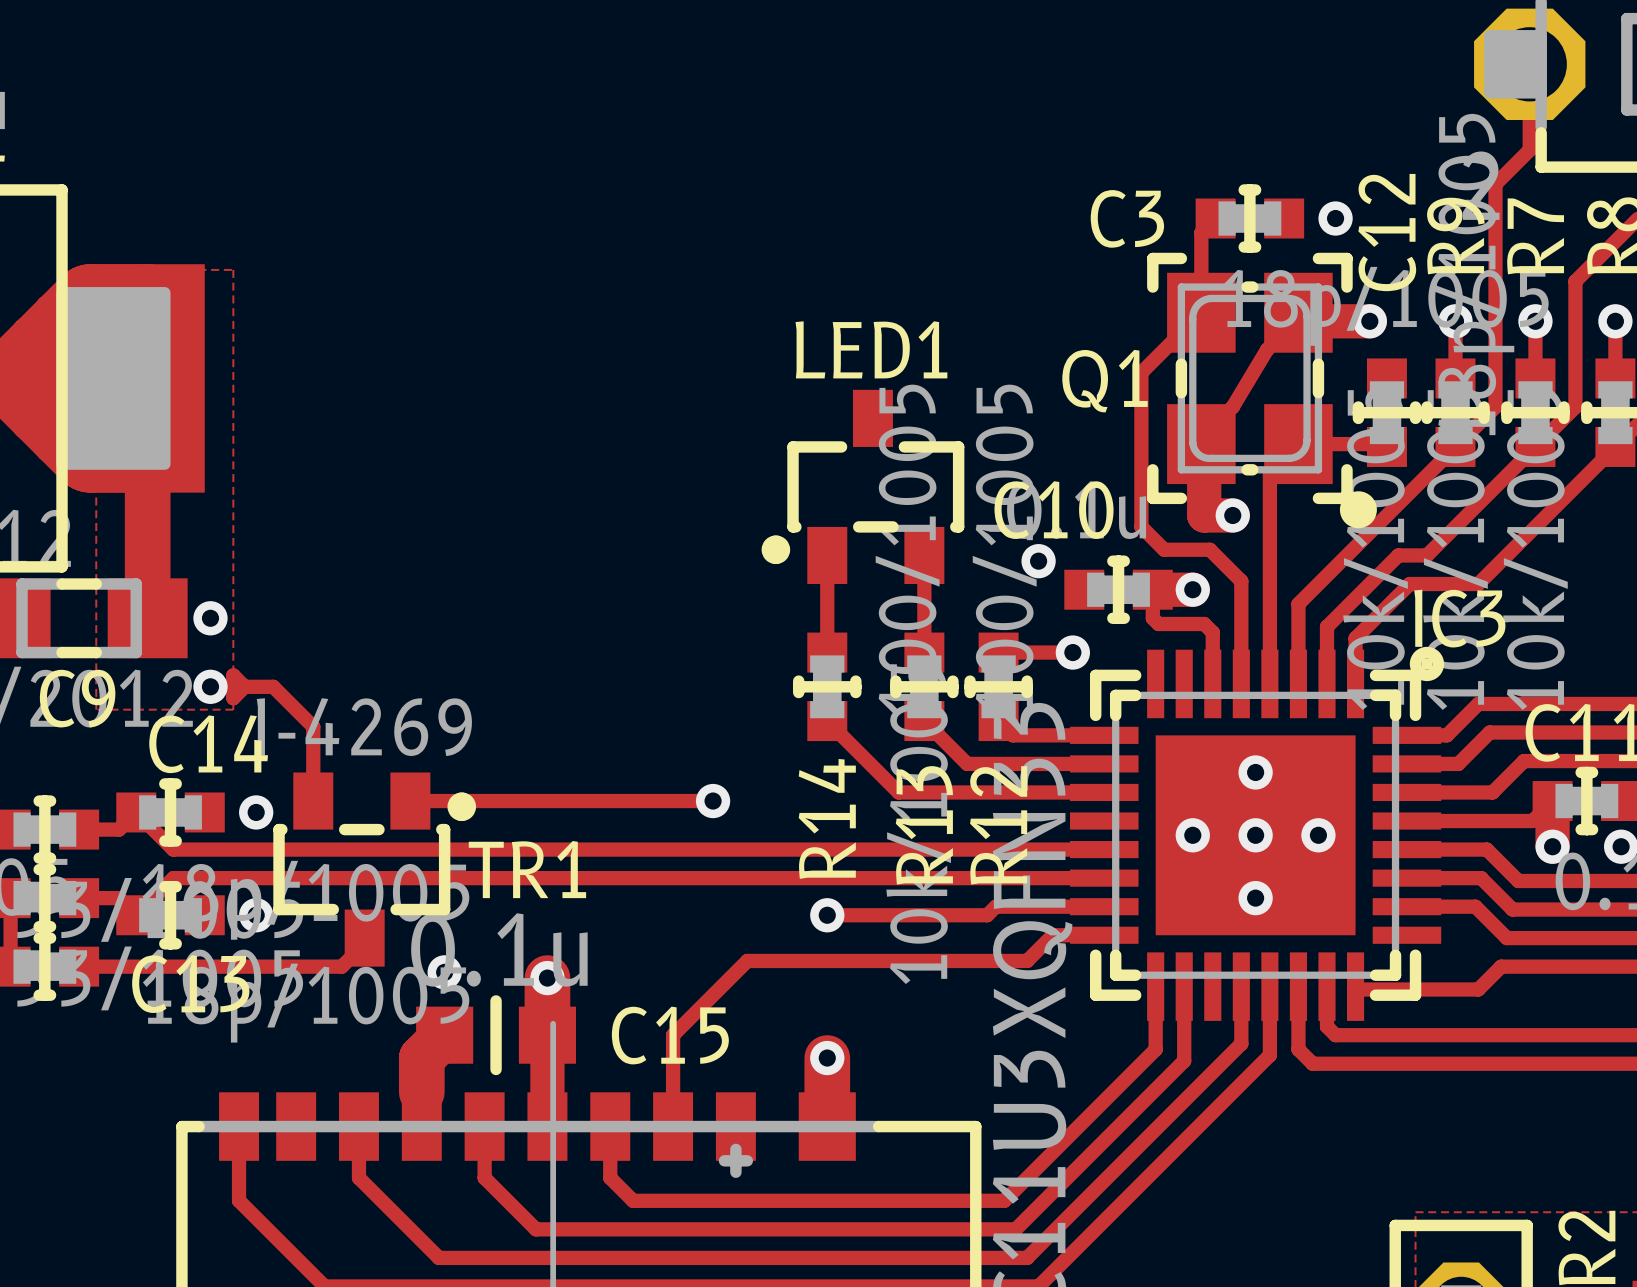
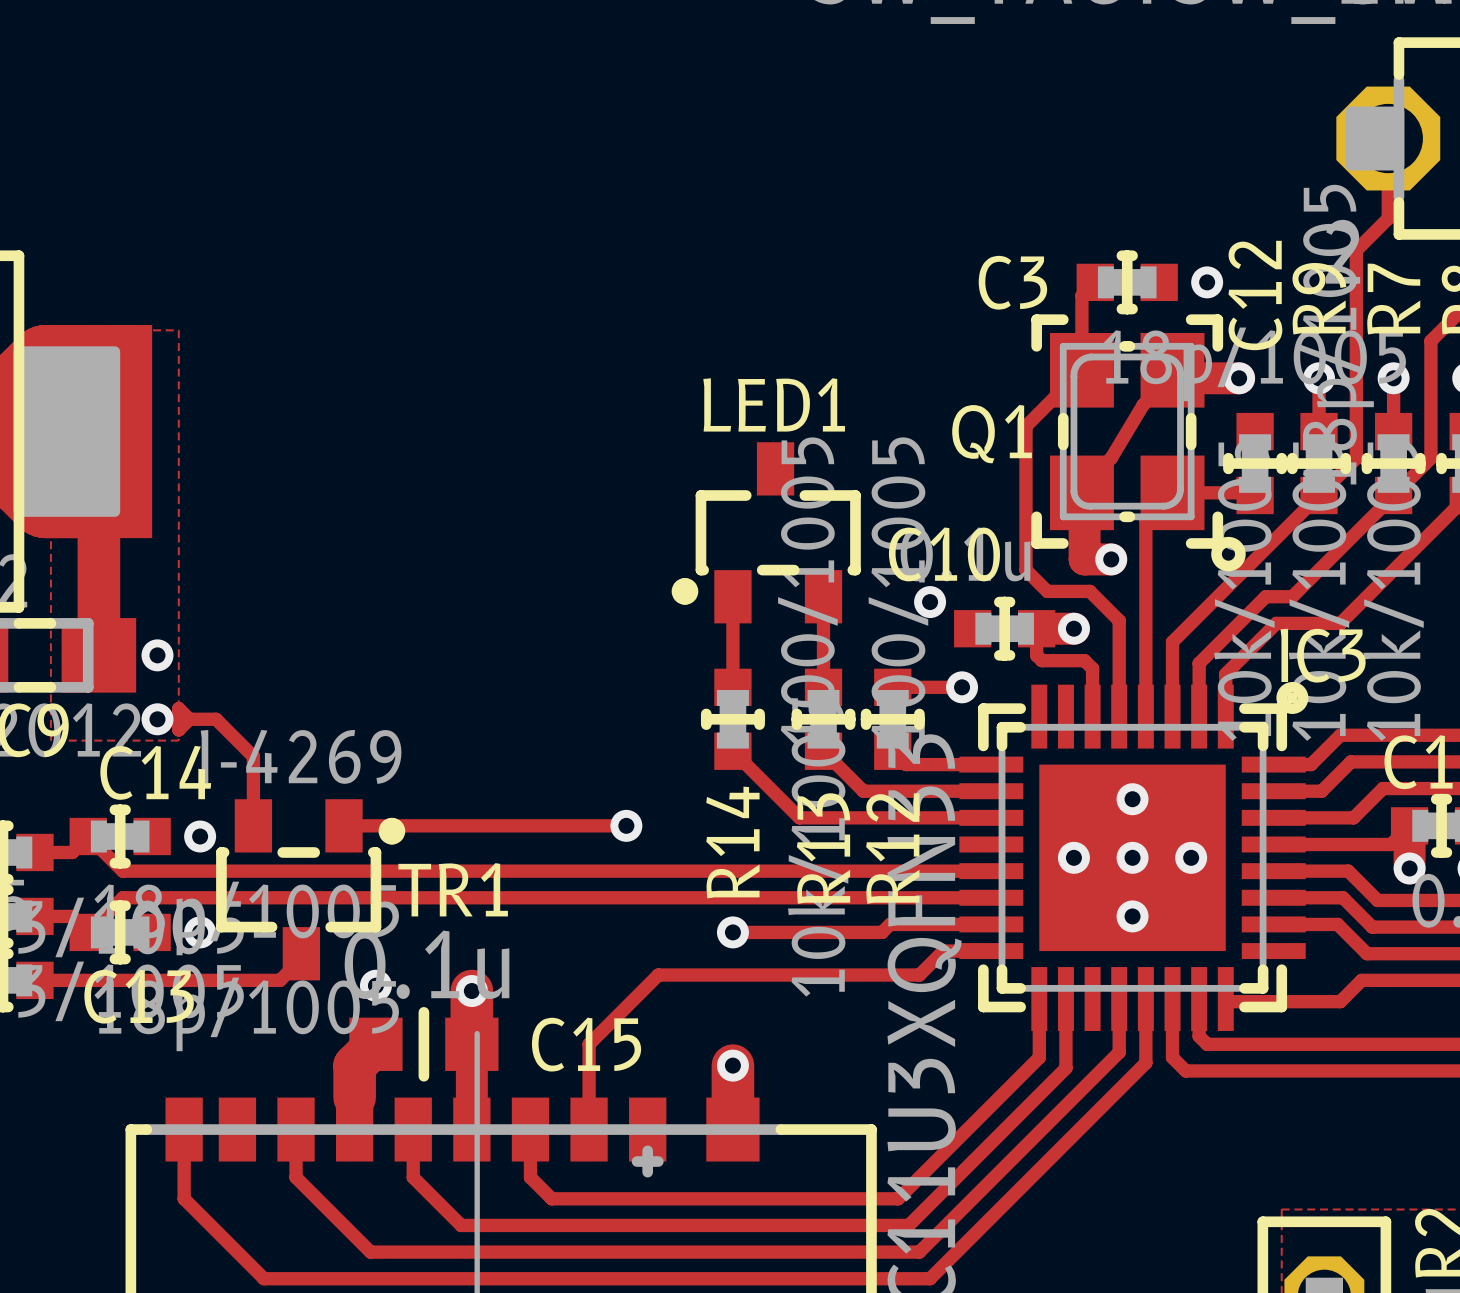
Q1 footprint: [1147, 252, 1377, 529] -> [1031, 314, 1246, 572]

